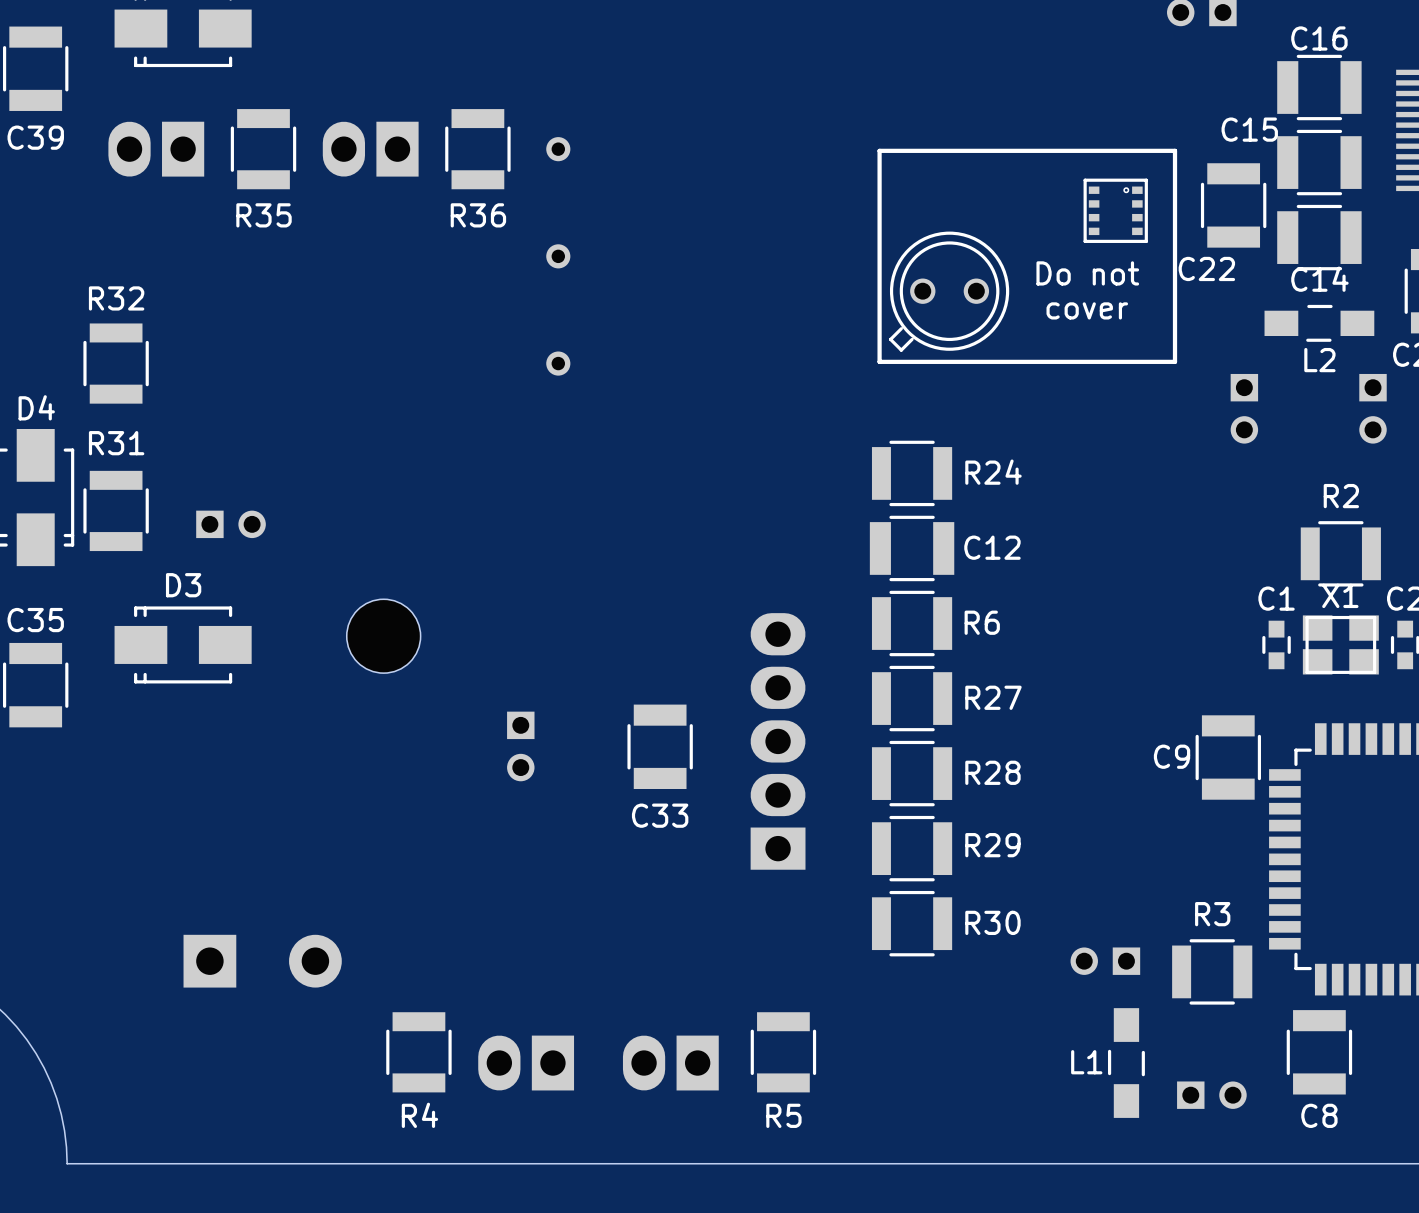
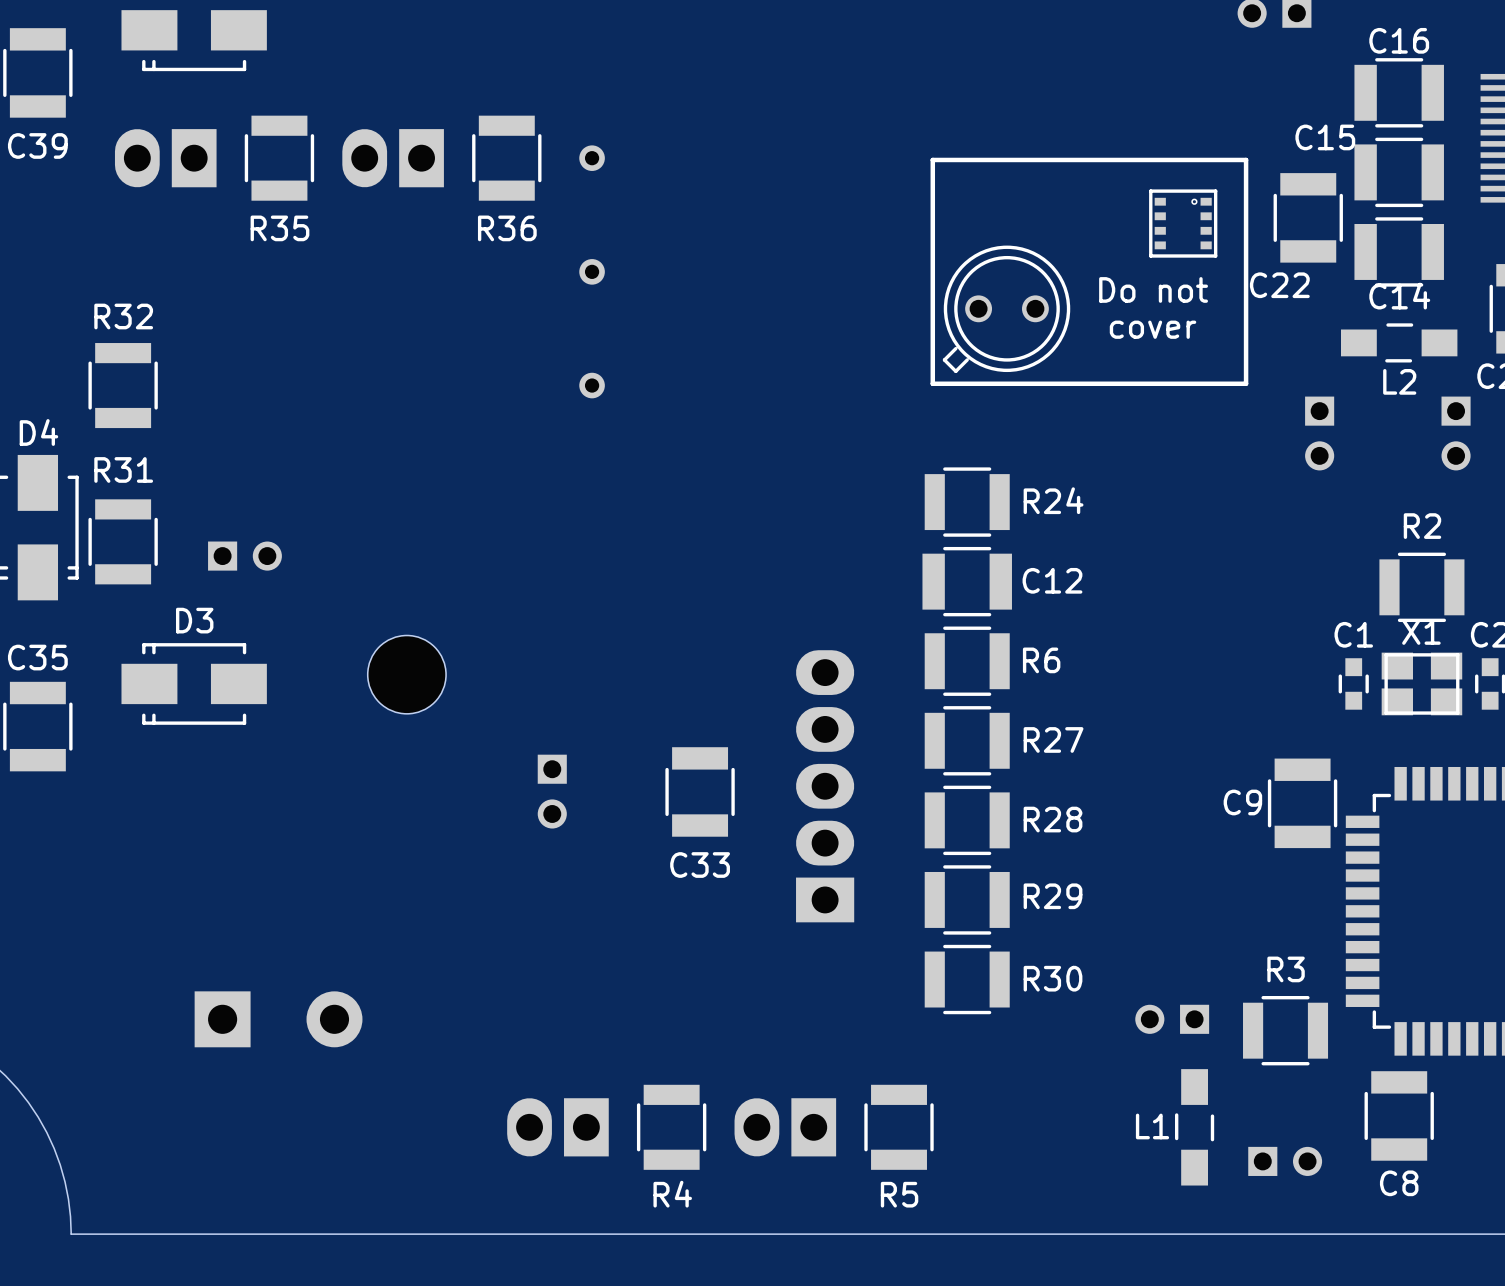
R4 position: (418, 1052) -> (671, 1127)
R5 position: (783, 1052) -> (899, 1127)
part position: (670, 1063) -> (785, 1127)

